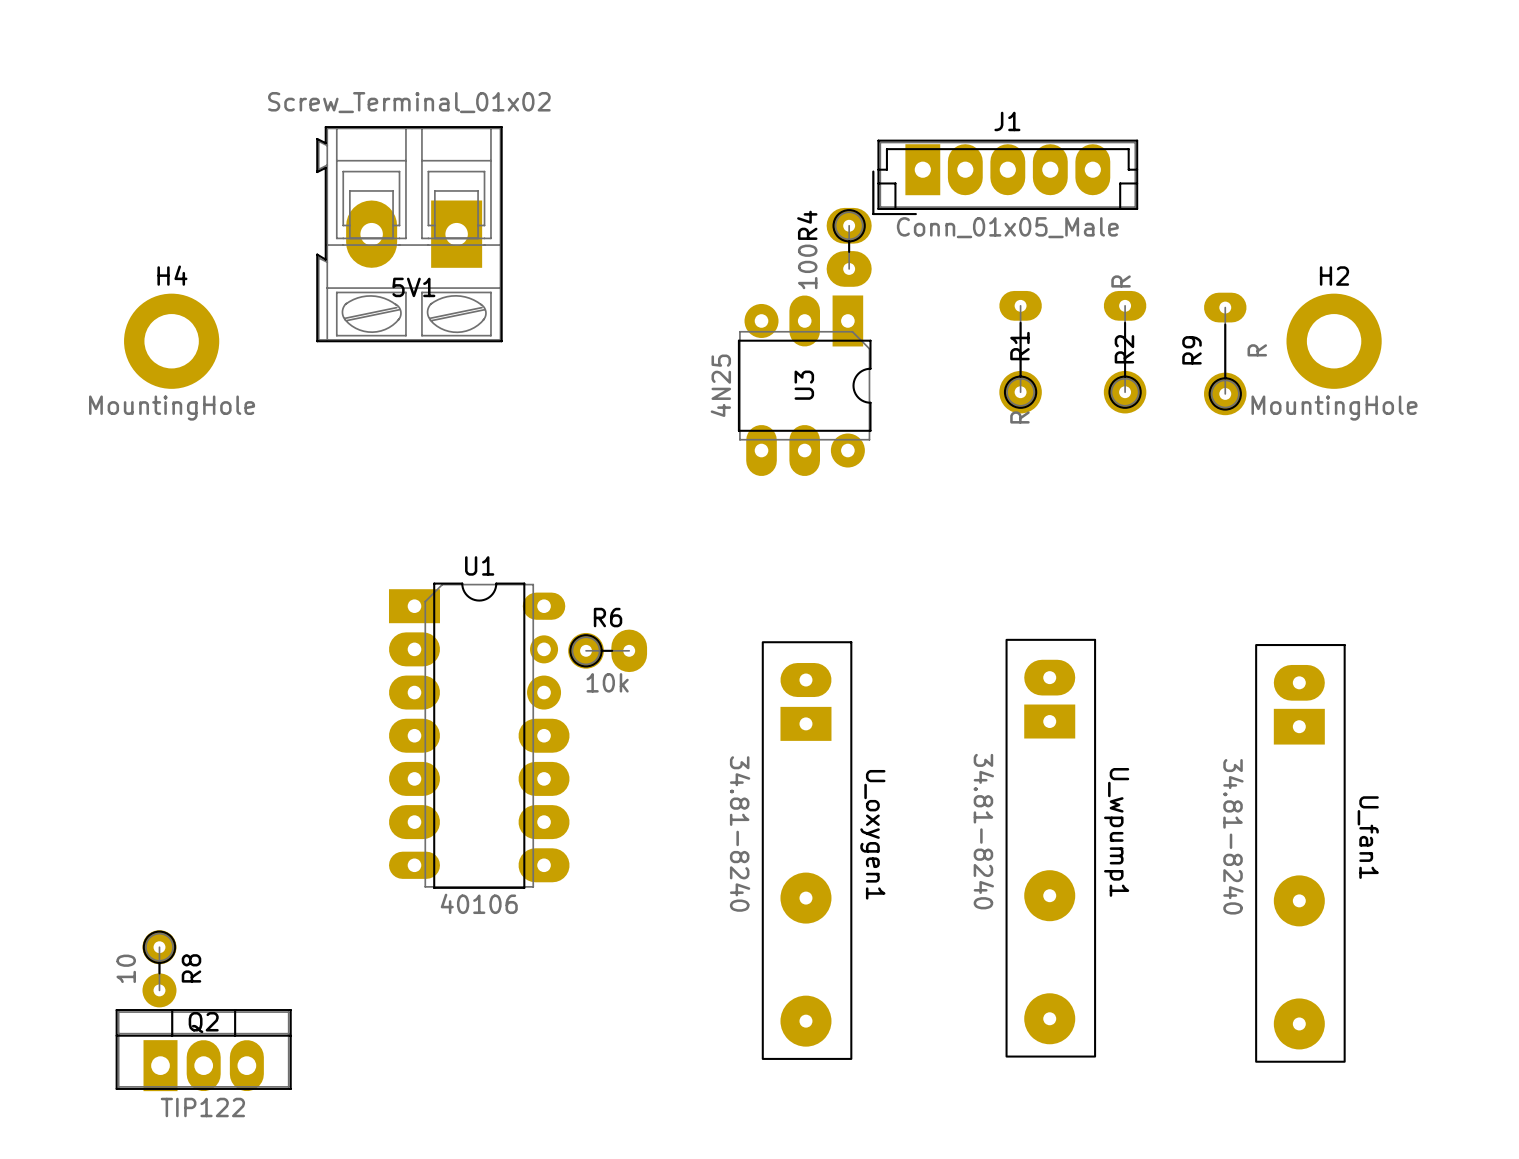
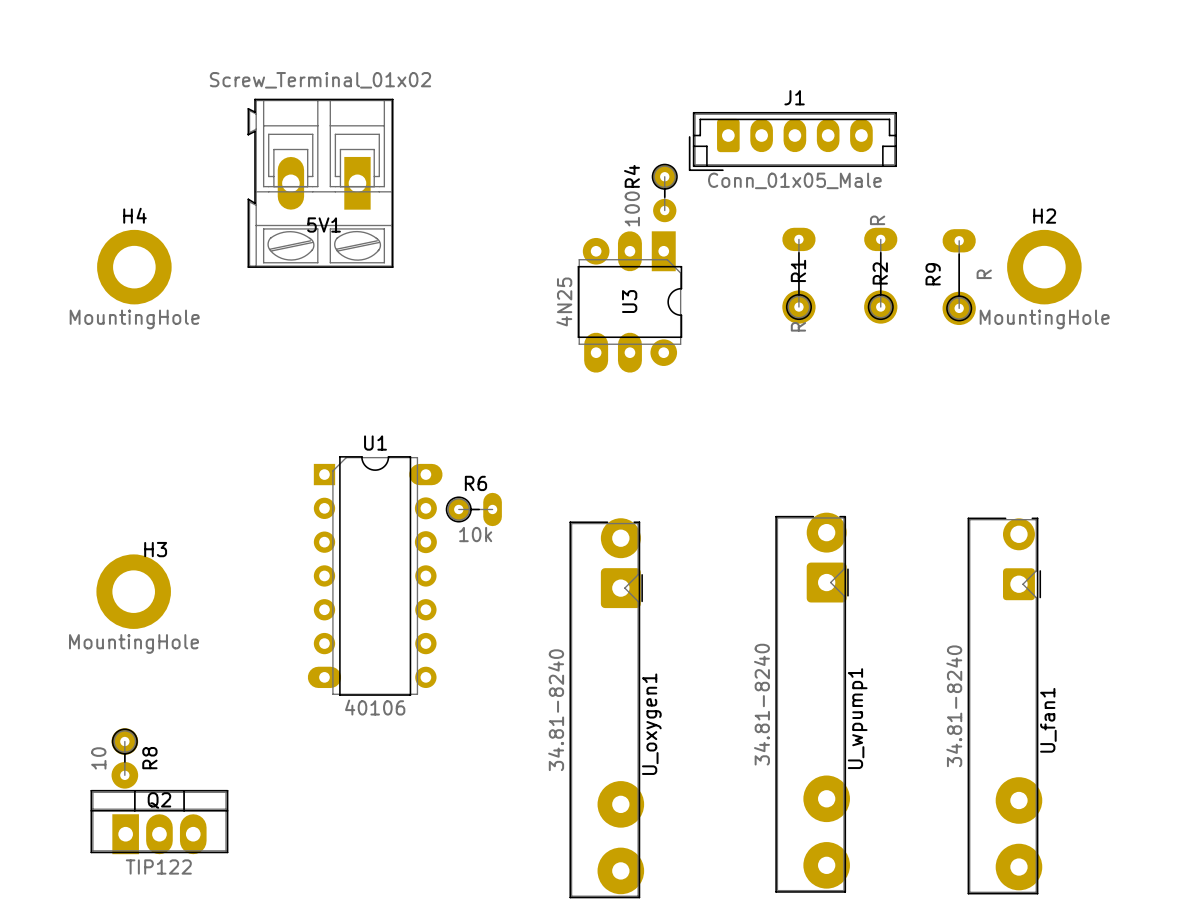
5V1 footprint: [316, 126, 503, 343] -> [247, 98, 394, 268]
J1 footprint: [872, 139, 1139, 216] -> [688, 111, 897, 172]
R4 footprint: [826, 207, 872, 287] -> [651, 163, 678, 223]
U1 footprint: [388, 582, 570, 889] -> [307, 456, 443, 696]
R6 footprint: [568, 629, 648, 673] -> [445, 492, 502, 527]
U_wpump1 footprint: [1005, 638, 1097, 1058] -> [775, 512, 850, 893]
U_oxygen1 footprint: [761, 641, 853, 1060] -> [569, 518, 645, 899]
U_fan1 footprint: [1255, 644, 1346, 1063] -> [967, 517, 1043, 895]
H3: none -> MountingHole (133, 591)
U_wpump1 name position: U_wpump1 (1116, 832) -> U_wpump1 (857, 718)
U_oxygen1 name position: U_oxygen1 (872, 834) -> U_oxygen1 (651, 724)
U_fan1 name position: U_fan1 (1368, 837) -> U_fan1 (1048, 720)

